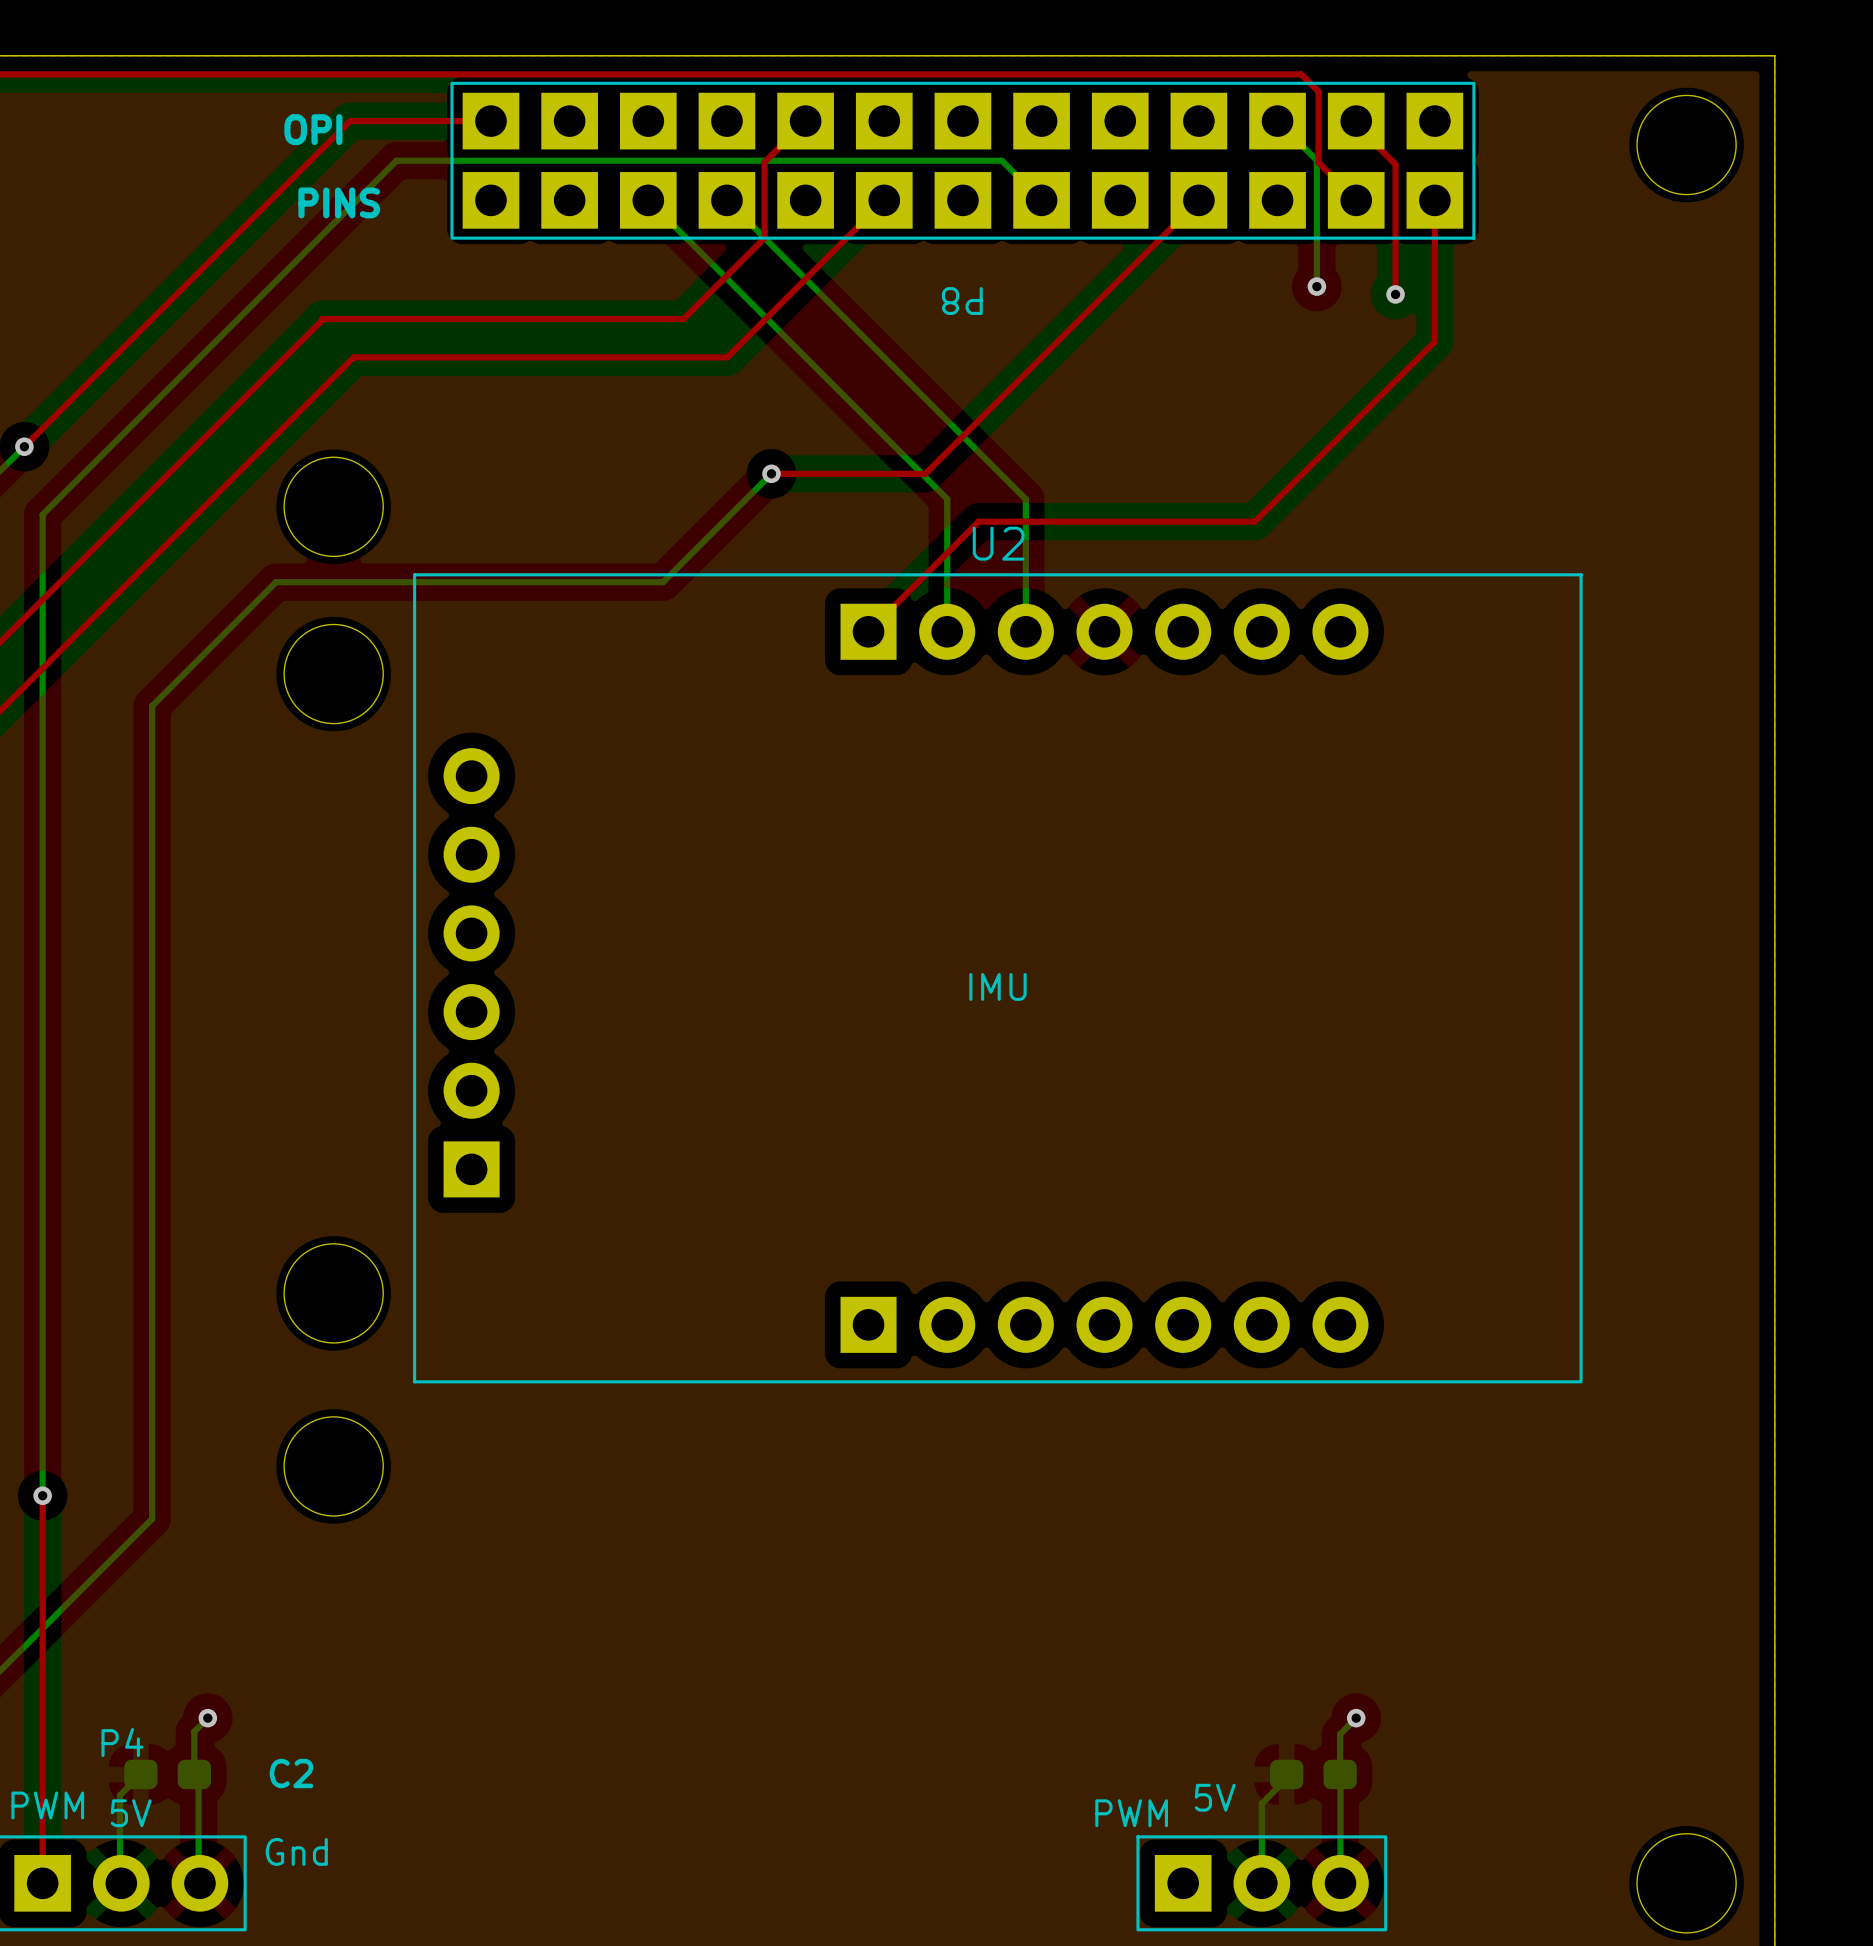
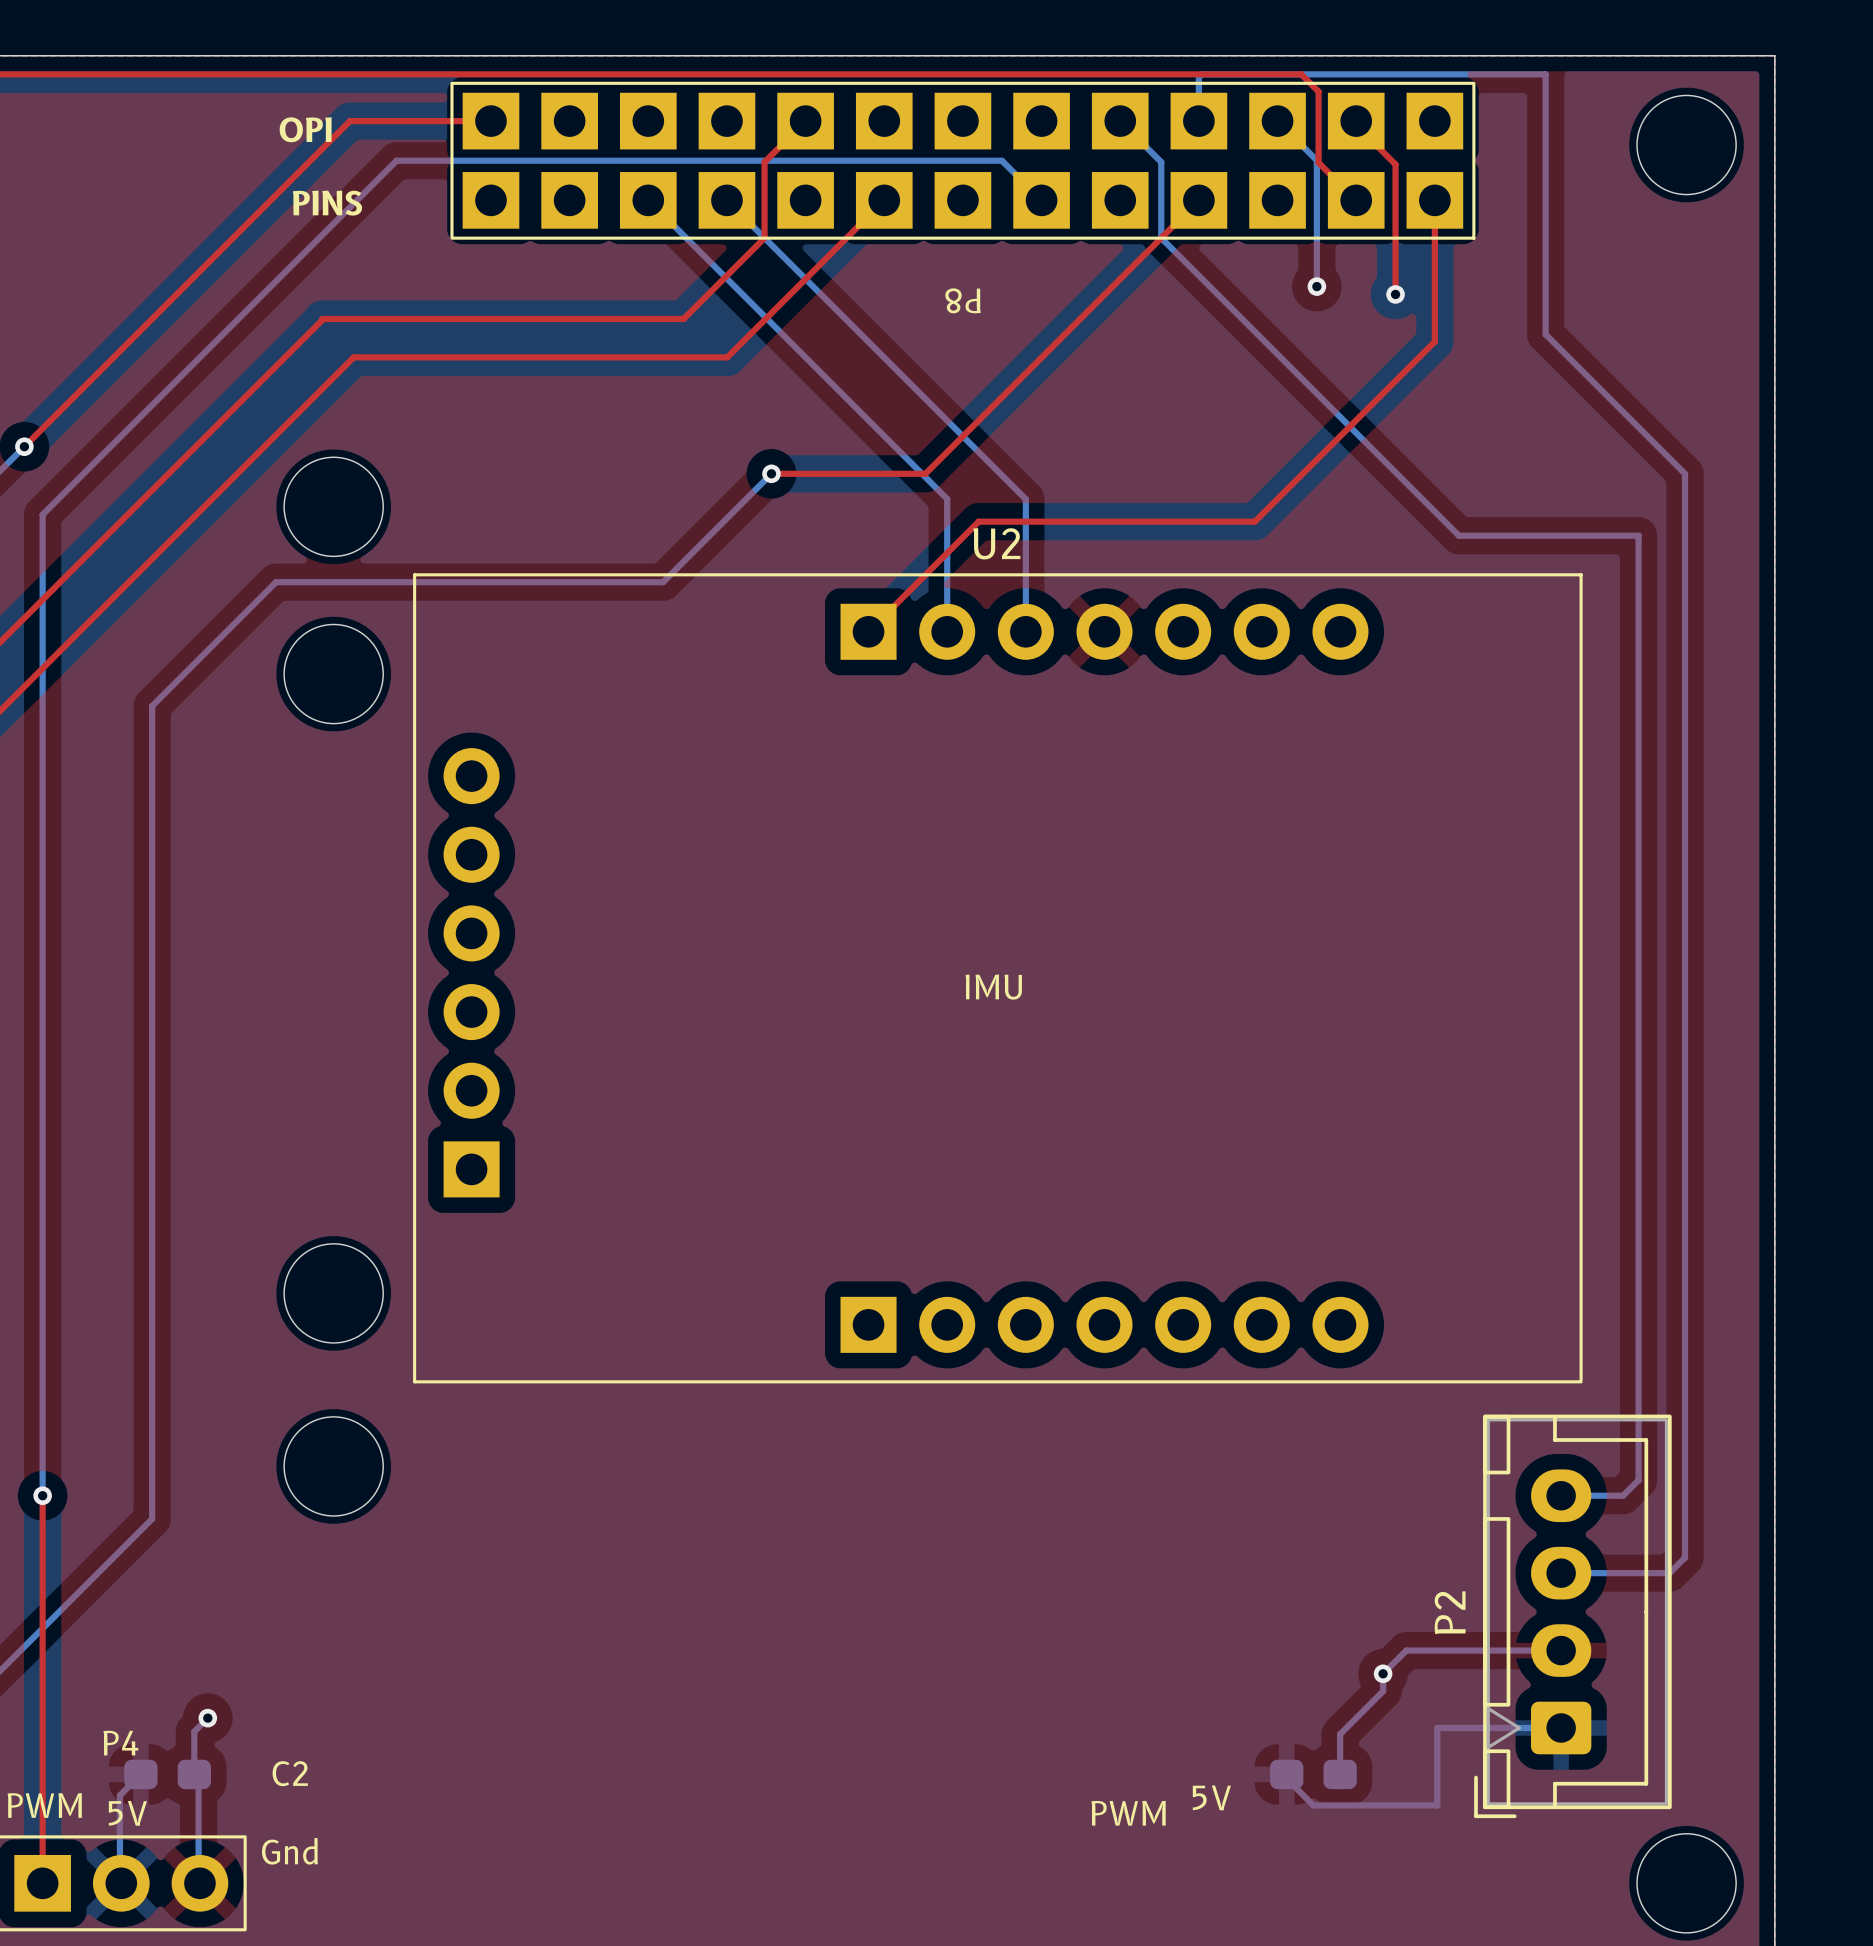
bottom track: none -> (1120, 121) (1161, 162) (1161, 238) (1458, 535) (1638, 535) (1638, 1480) (1623, 1495) (1561, 1495)
bottom track: none -> (1198, 121) (1198, 77) (1201, 74) (1545, 74) (1545, 334) (1685, 473) (1685, 1557) (1669, 1573) (1561, 1573)
P2: none -> (1572, 1616)
bottom track: none -> (1561, 1650) (1406, 1650) (1383, 1673) (1383, 1691) (1356, 1718)
via position: (1356, 1718) -> (1383, 1673)
bottom track: (1286, 1778) (1261, 1803) (1261, 1883) -> (1286, 1778) (1313, 1805) (1437, 1805) (1437, 1727) (1561, 1727)
bottom track: (1340, 1779) (1340, 1883) -> none
part: (1261, 1883) -> none

